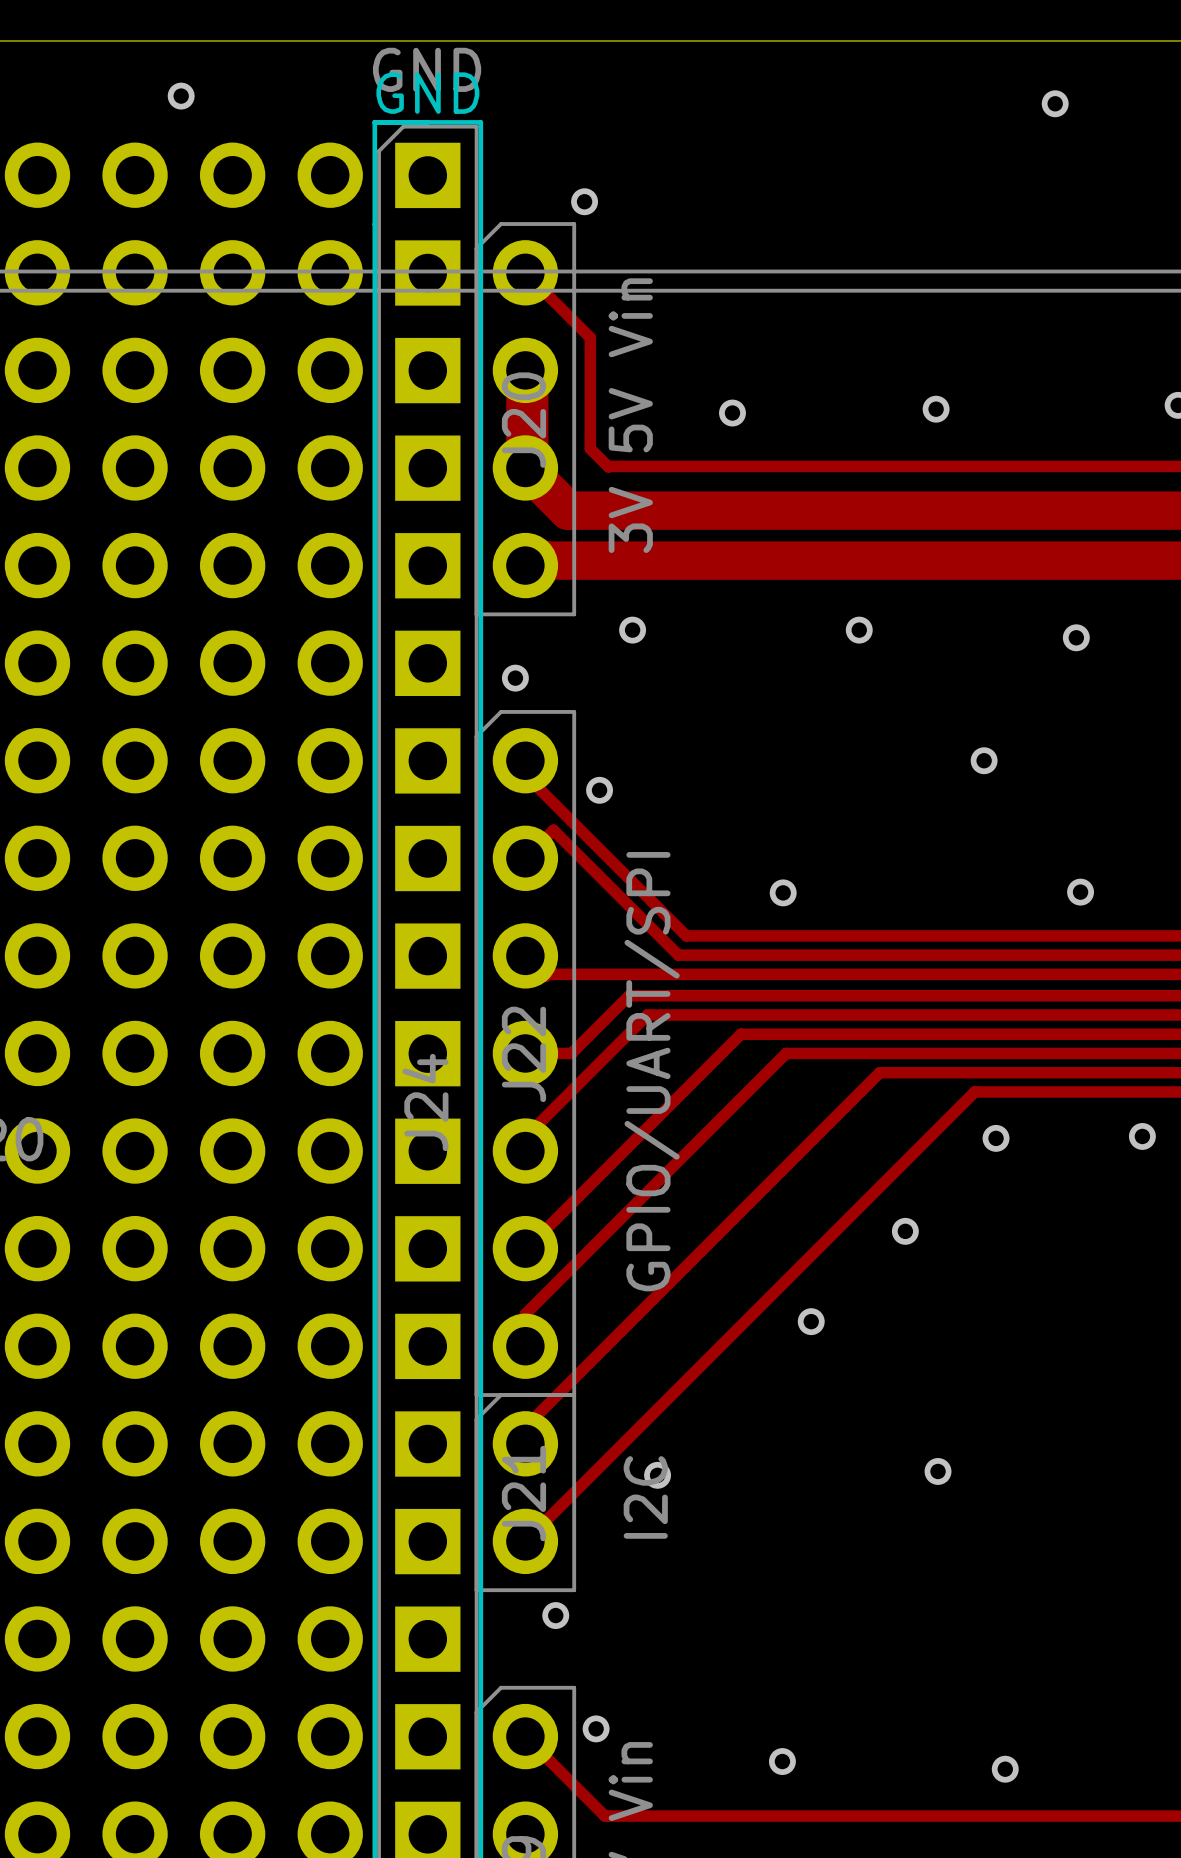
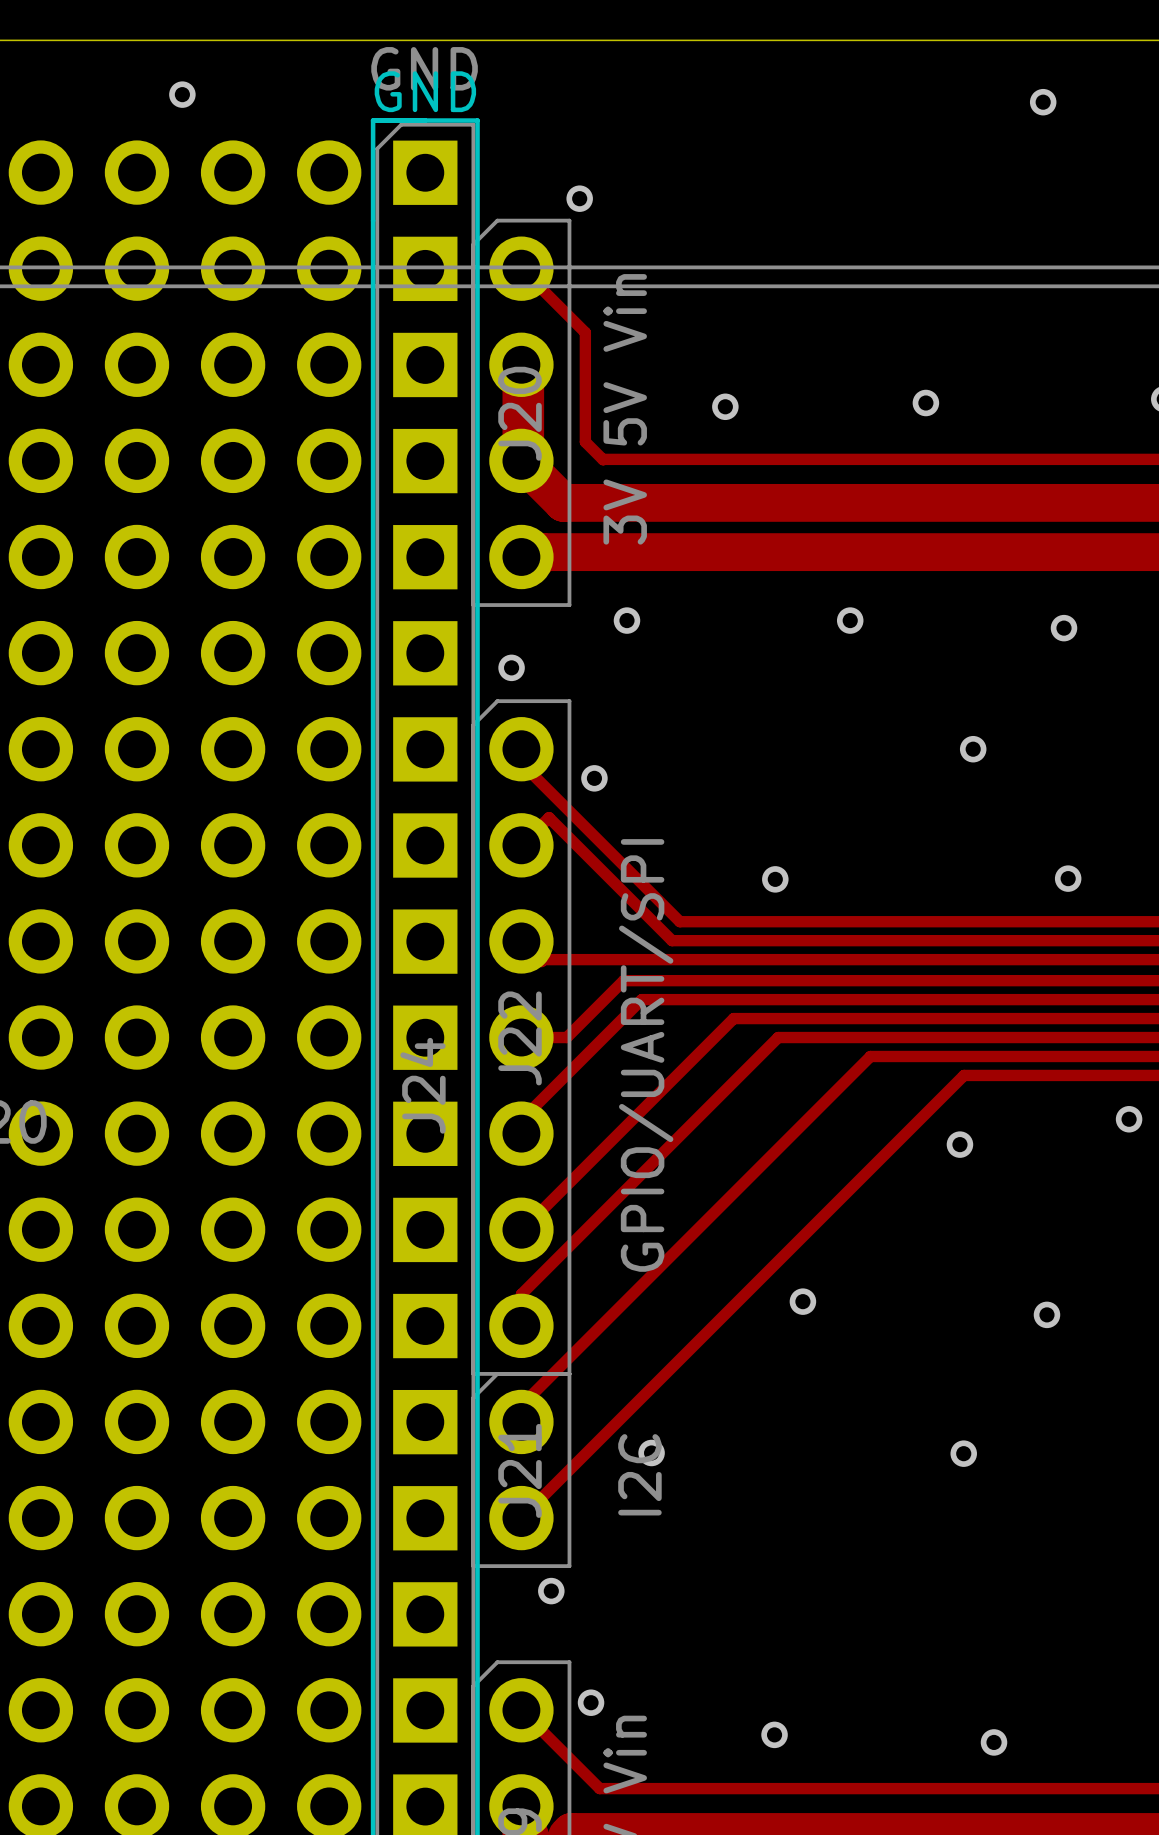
via position: (996, 1138) -> (959, 1144)
via: (905, 1231) -> none
via: none -> (1046, 1314)
via position: (938, 1471) -> (963, 1453)

